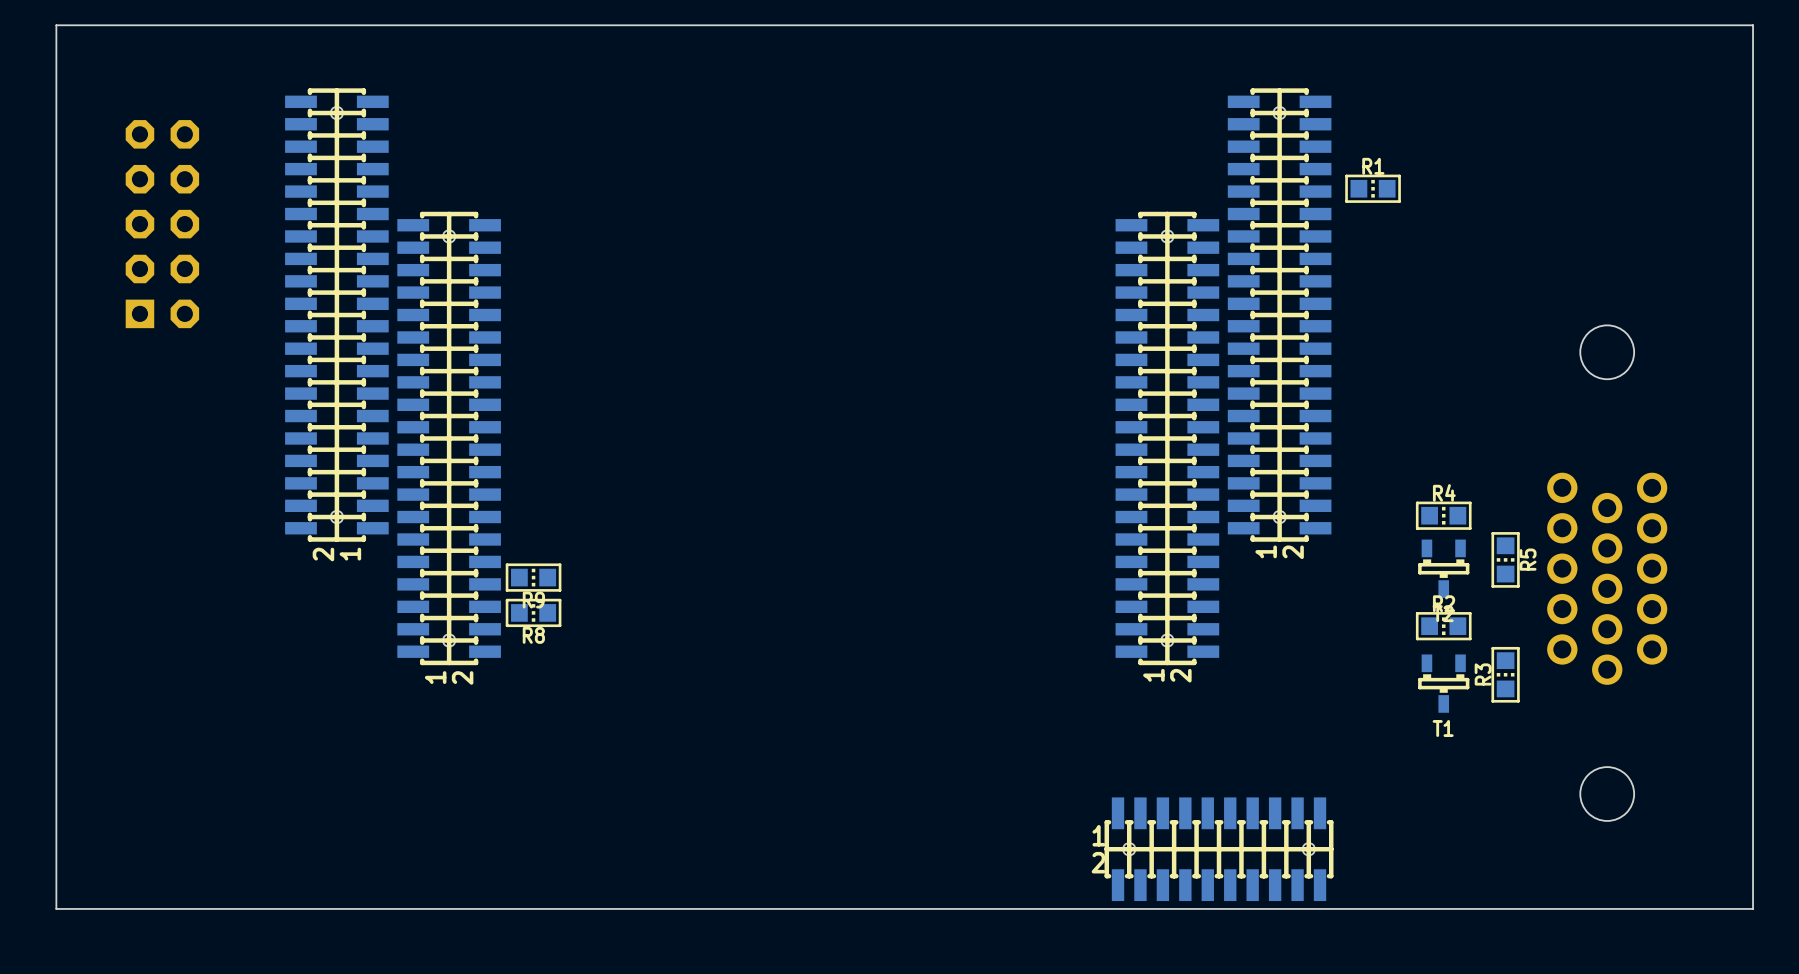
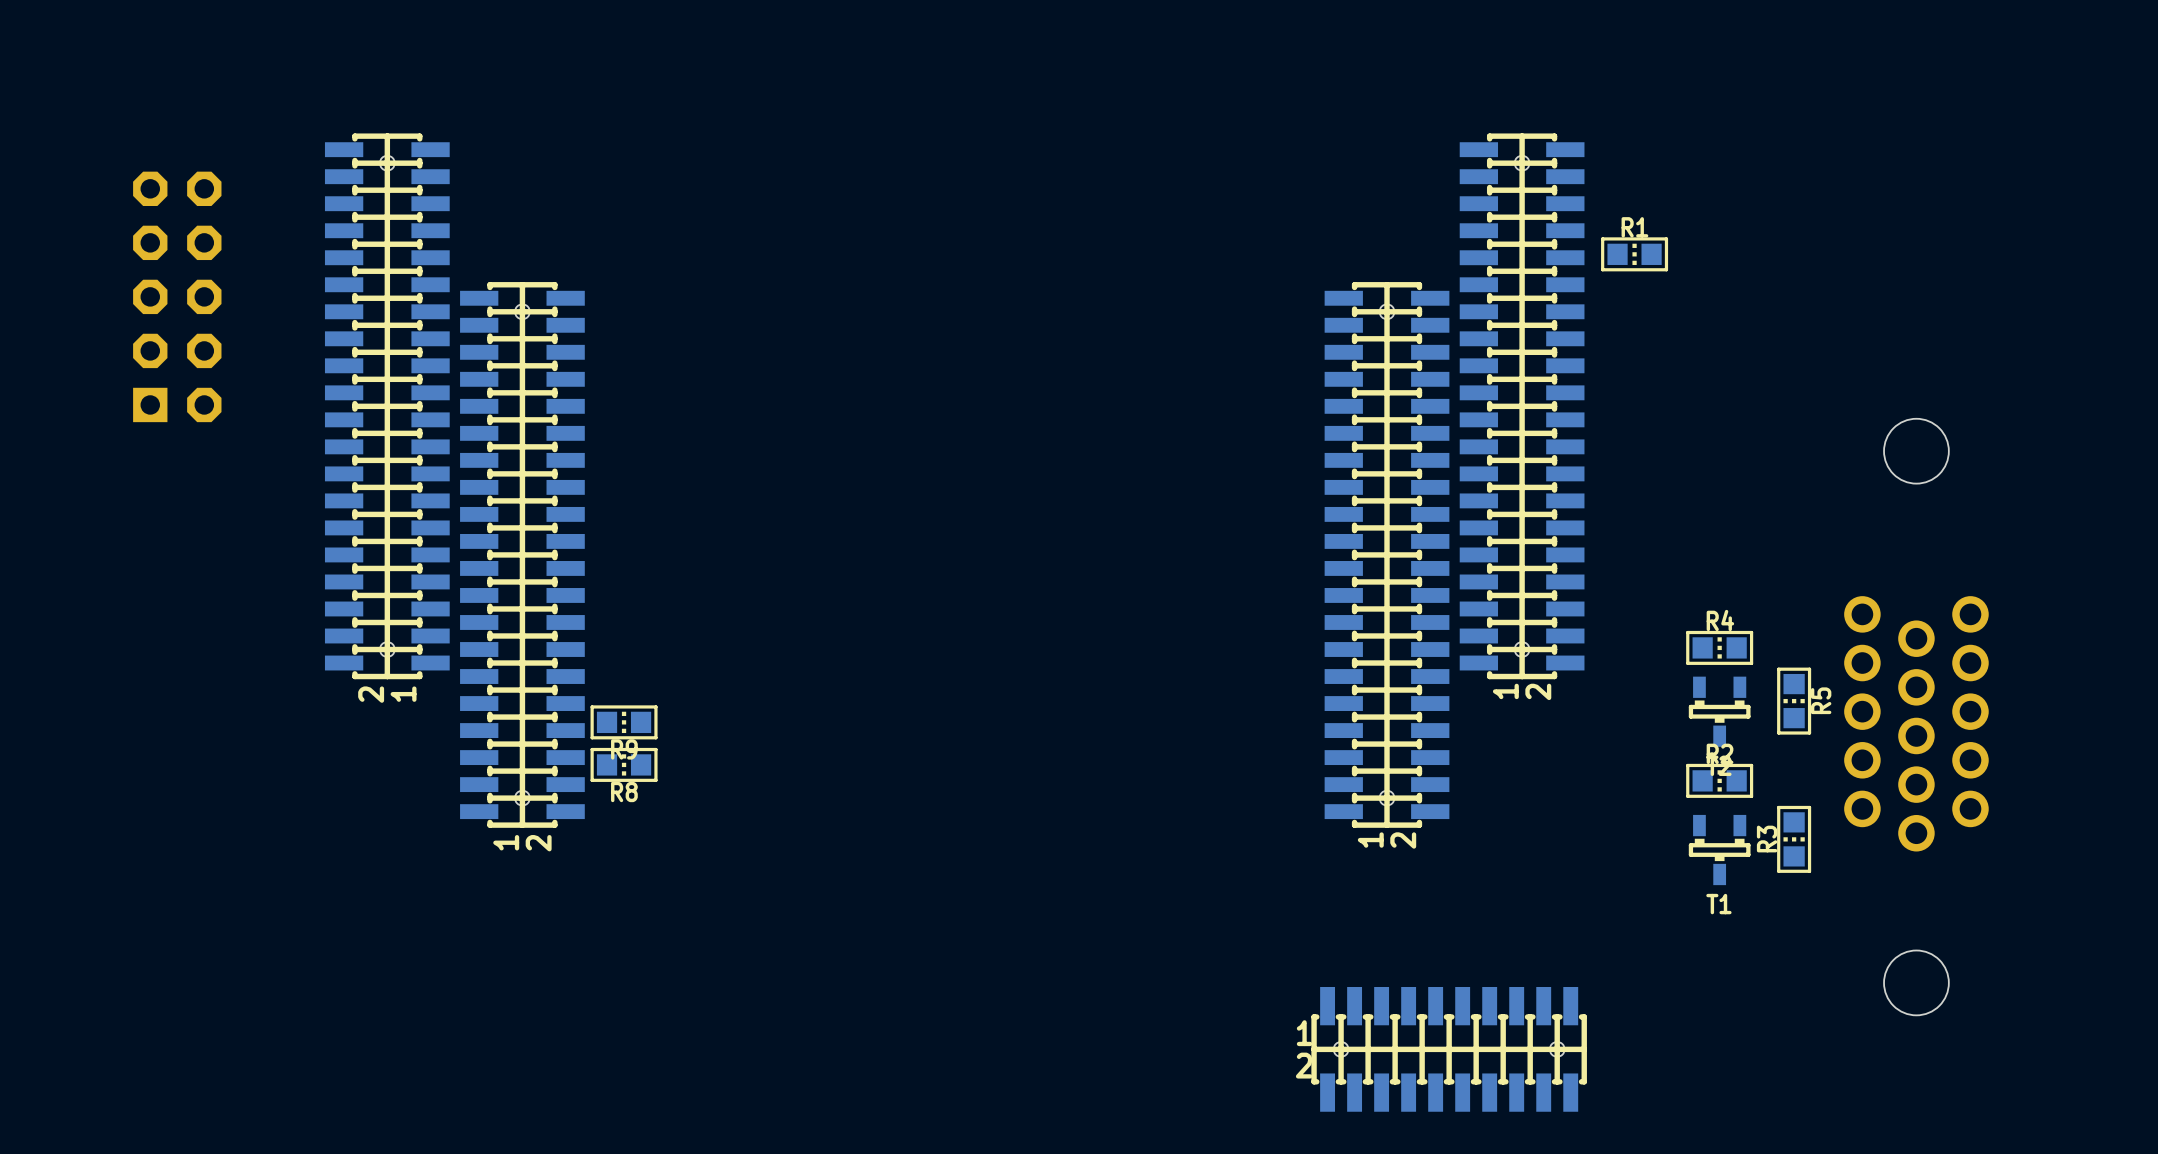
board edge: (1753, 25) (56, 25) (56, 908) (1753, 908) (1753, 25) -> none

